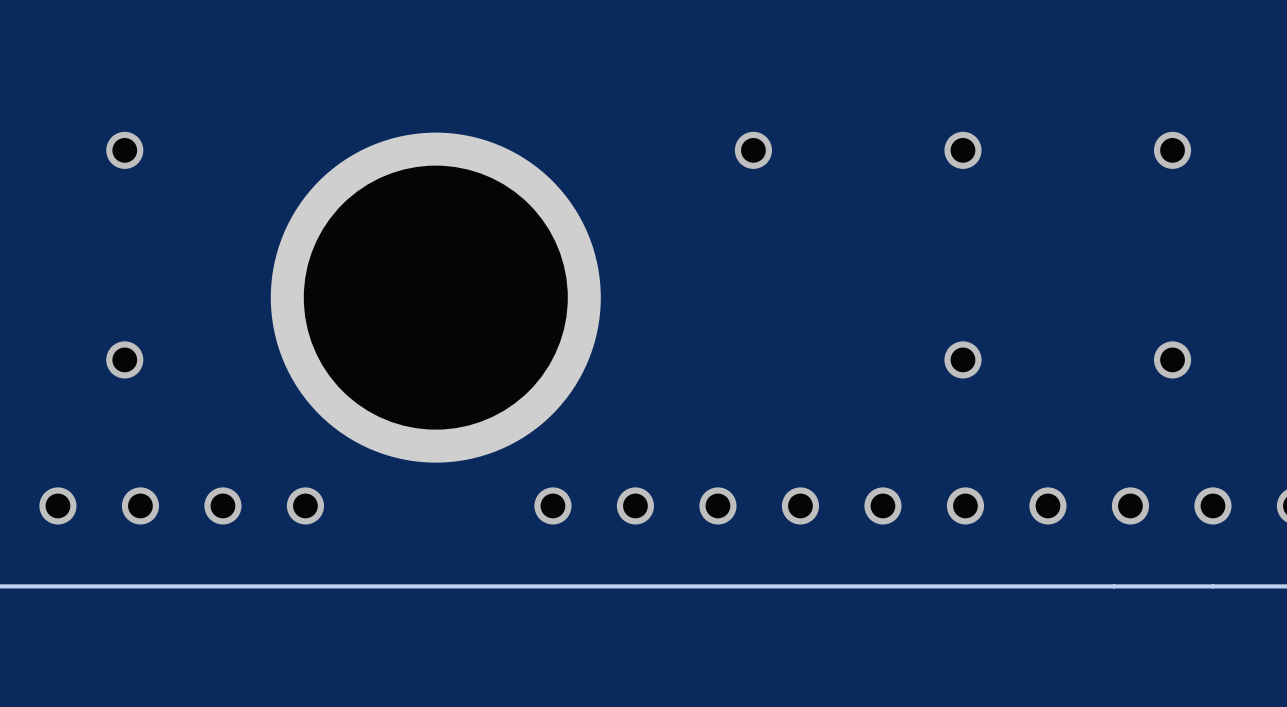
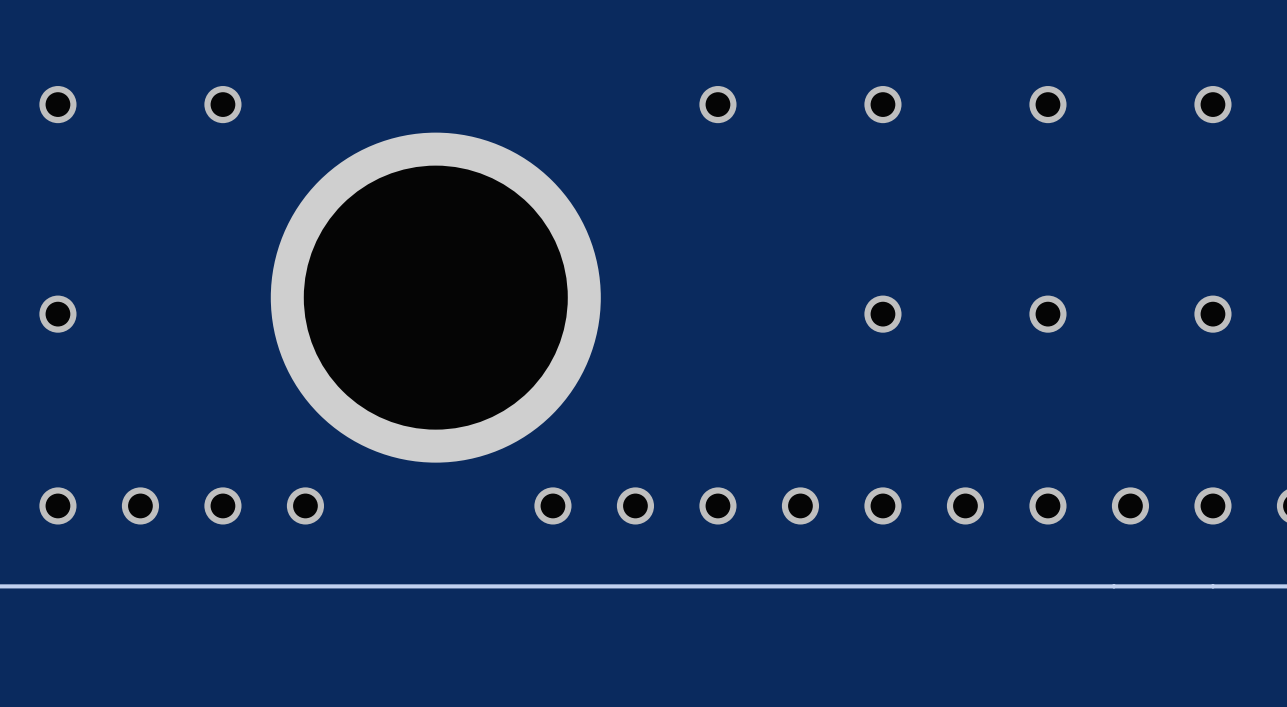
via: none -> (57, 104)
via: none -> (222, 104)
via: none -> (882, 104)
via: none -> (1047, 104)
via: (124, 150) -> none
via position: (753, 150) -> (717, 104)
via: (962, 150) -> none
via position: (1172, 150) -> (1212, 104)
via: none -> (57, 314)
via: none -> (882, 314)
via: none -> (1047, 314)
via: (124, 359) -> none
via: (962, 359) -> none
via position: (1172, 359) -> (1212, 314)

